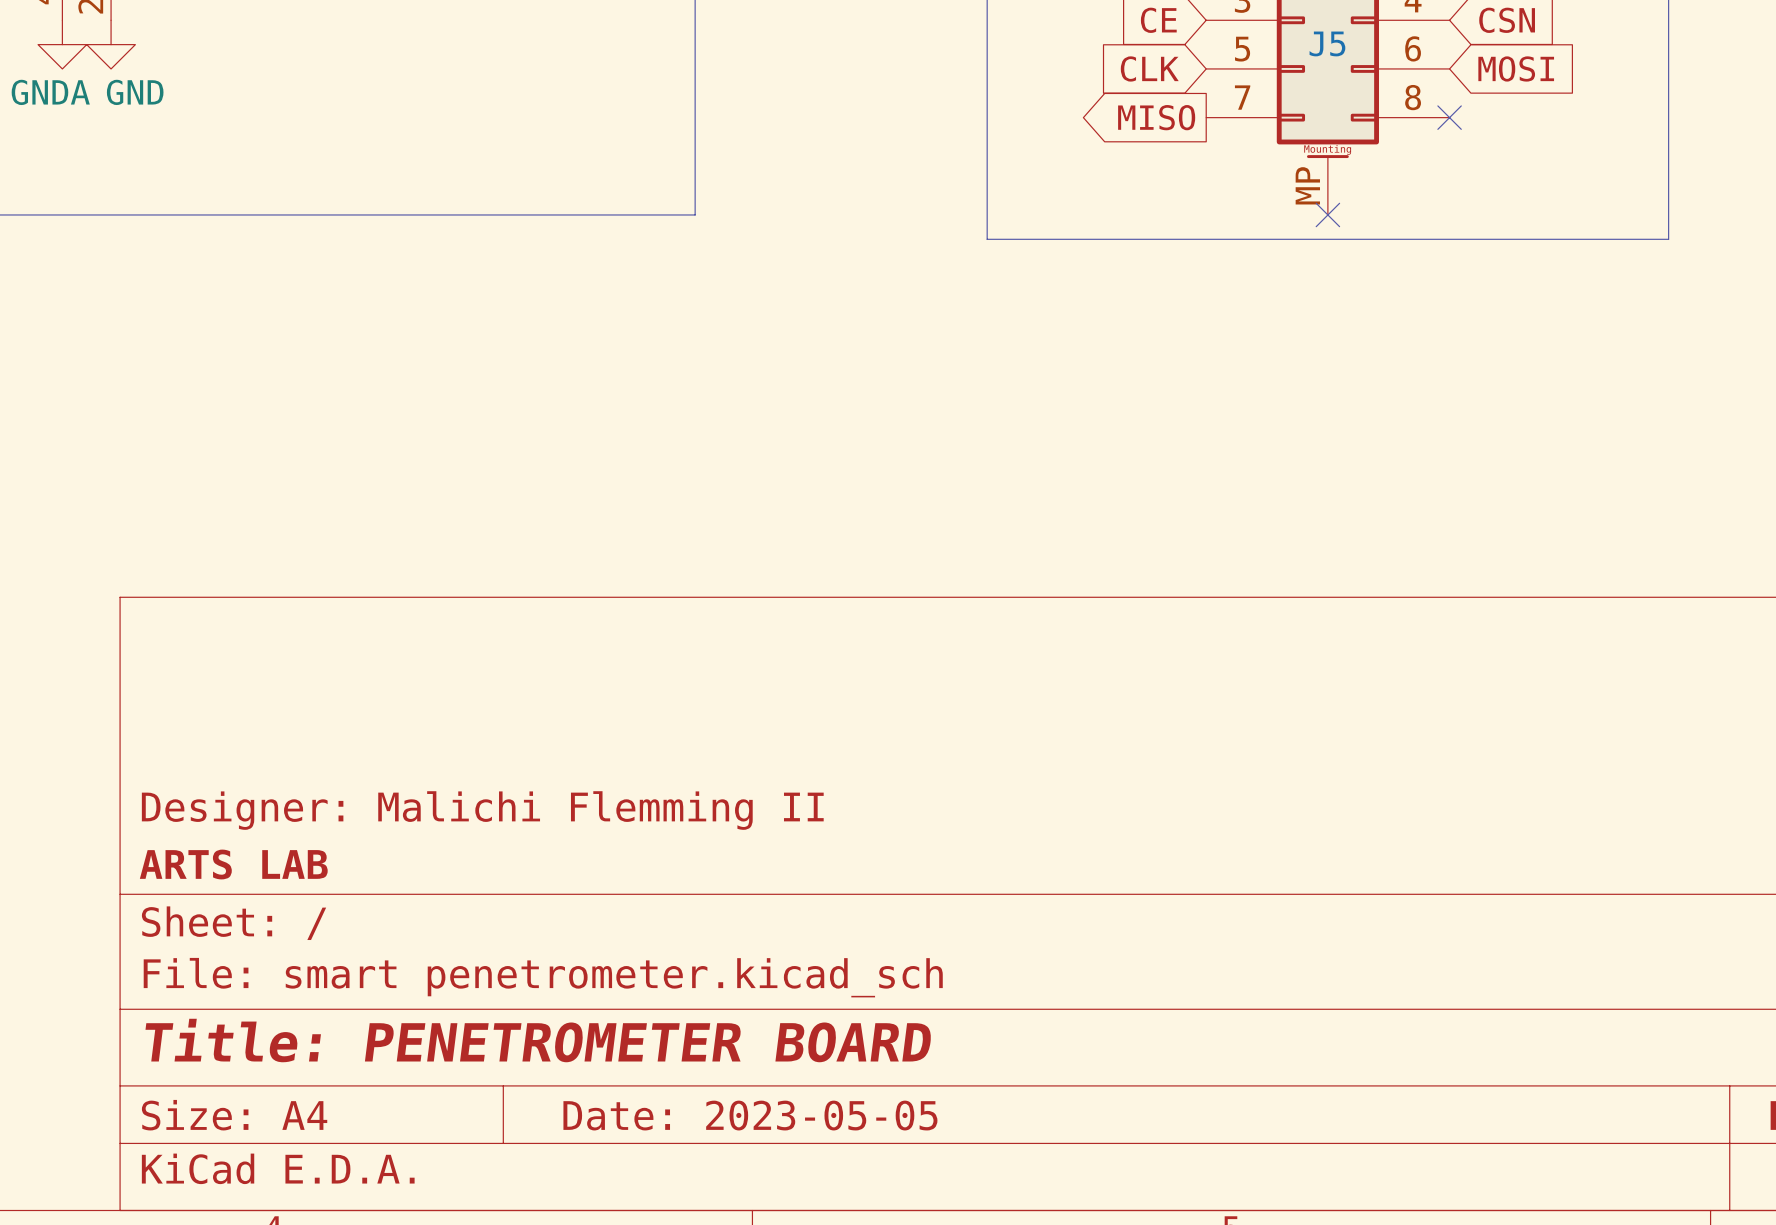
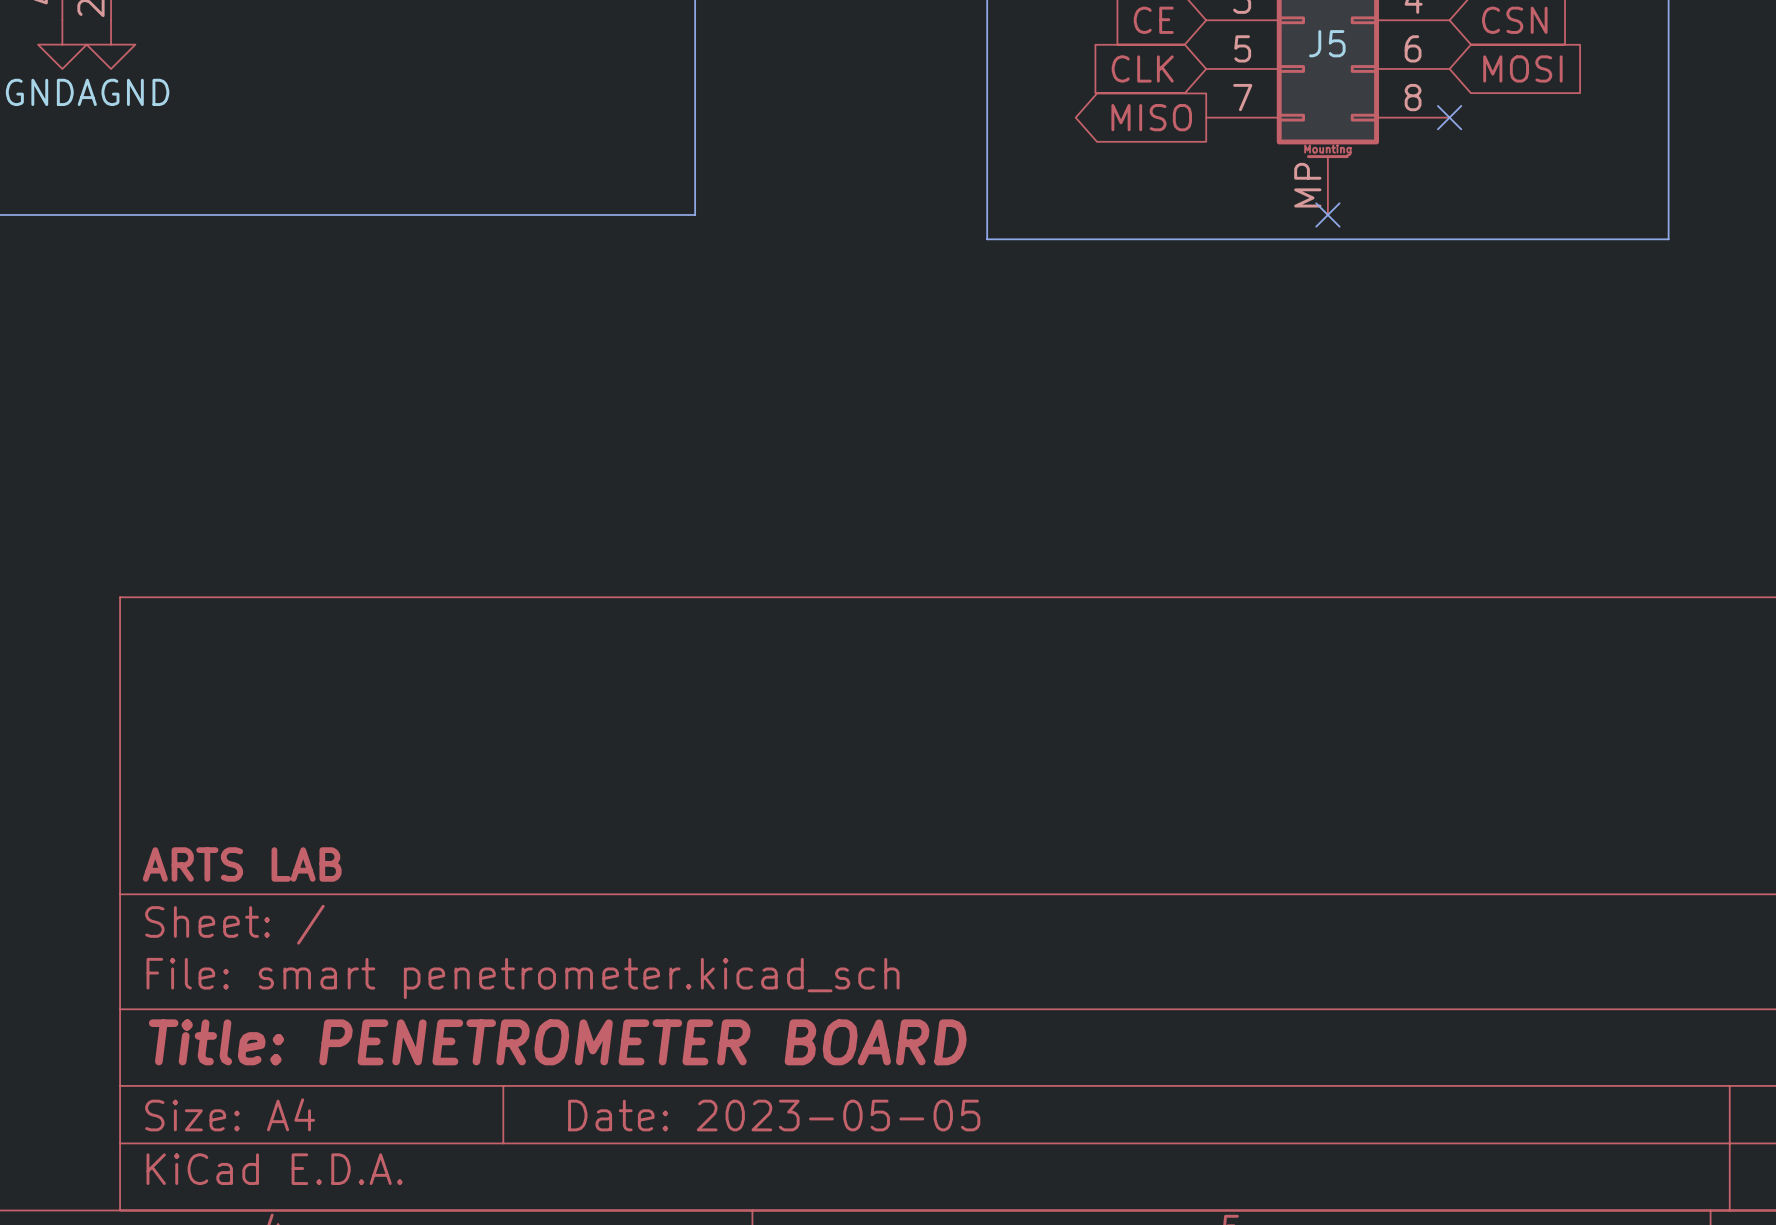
title block: Designer: Malichi Flemming II (482, 810) -> none

